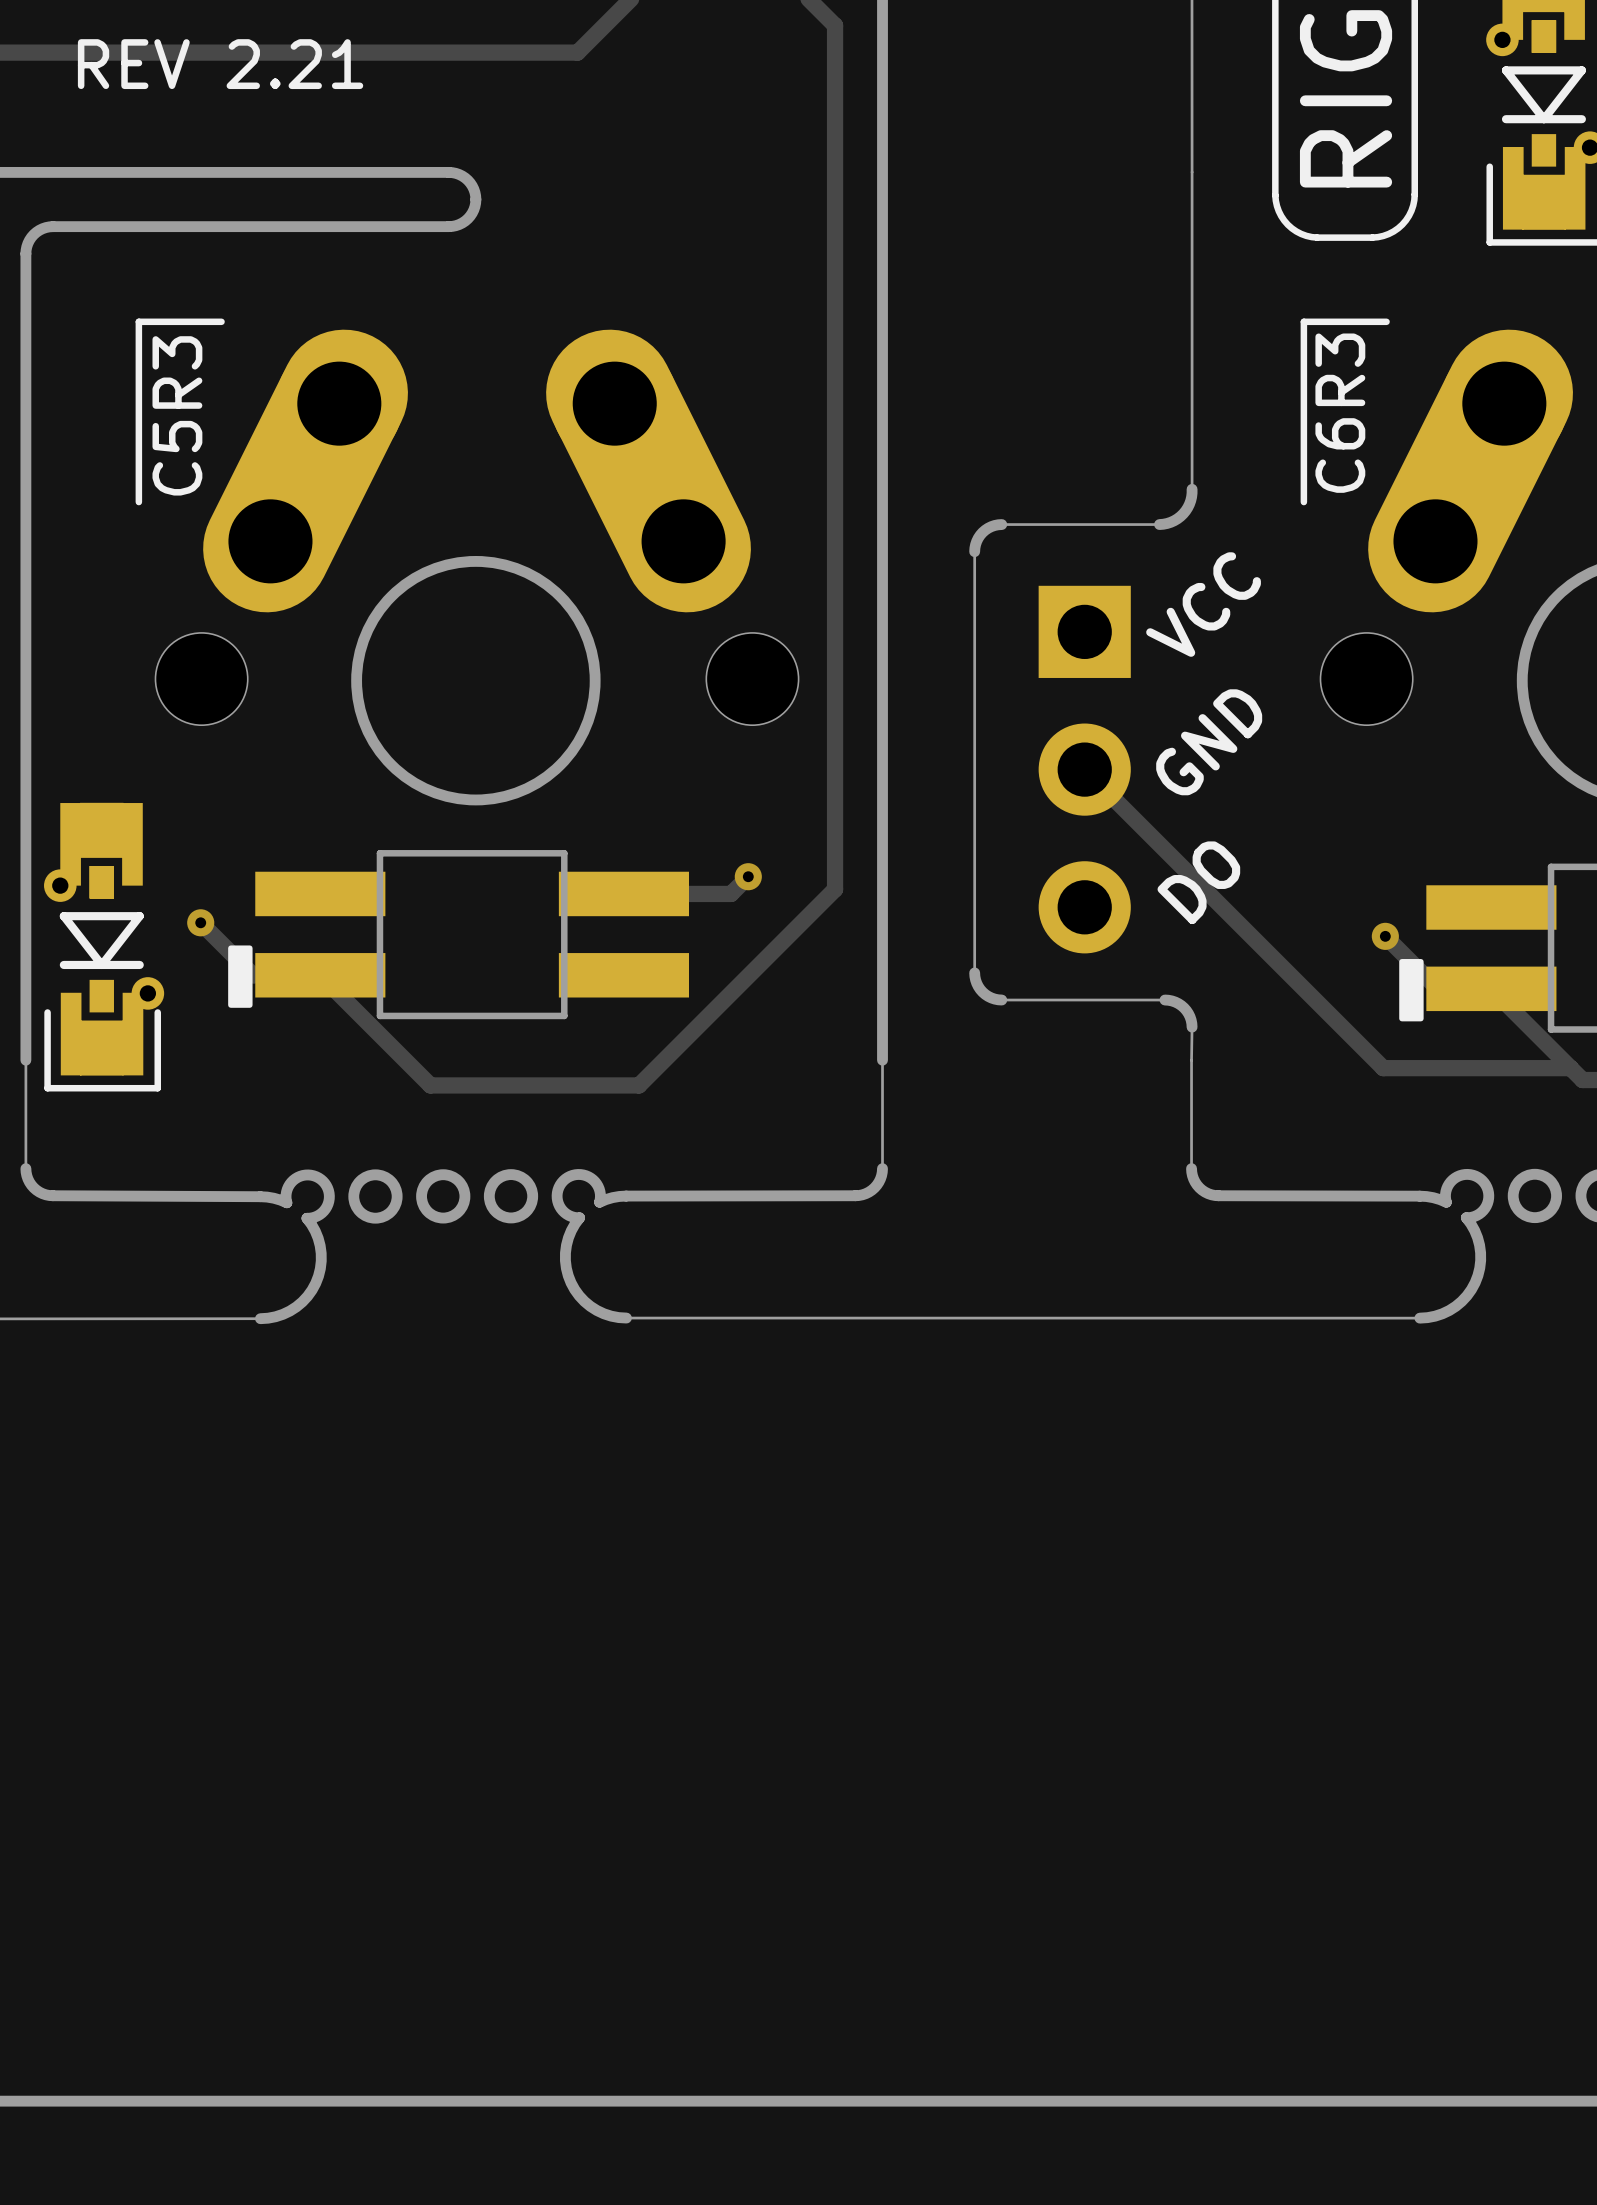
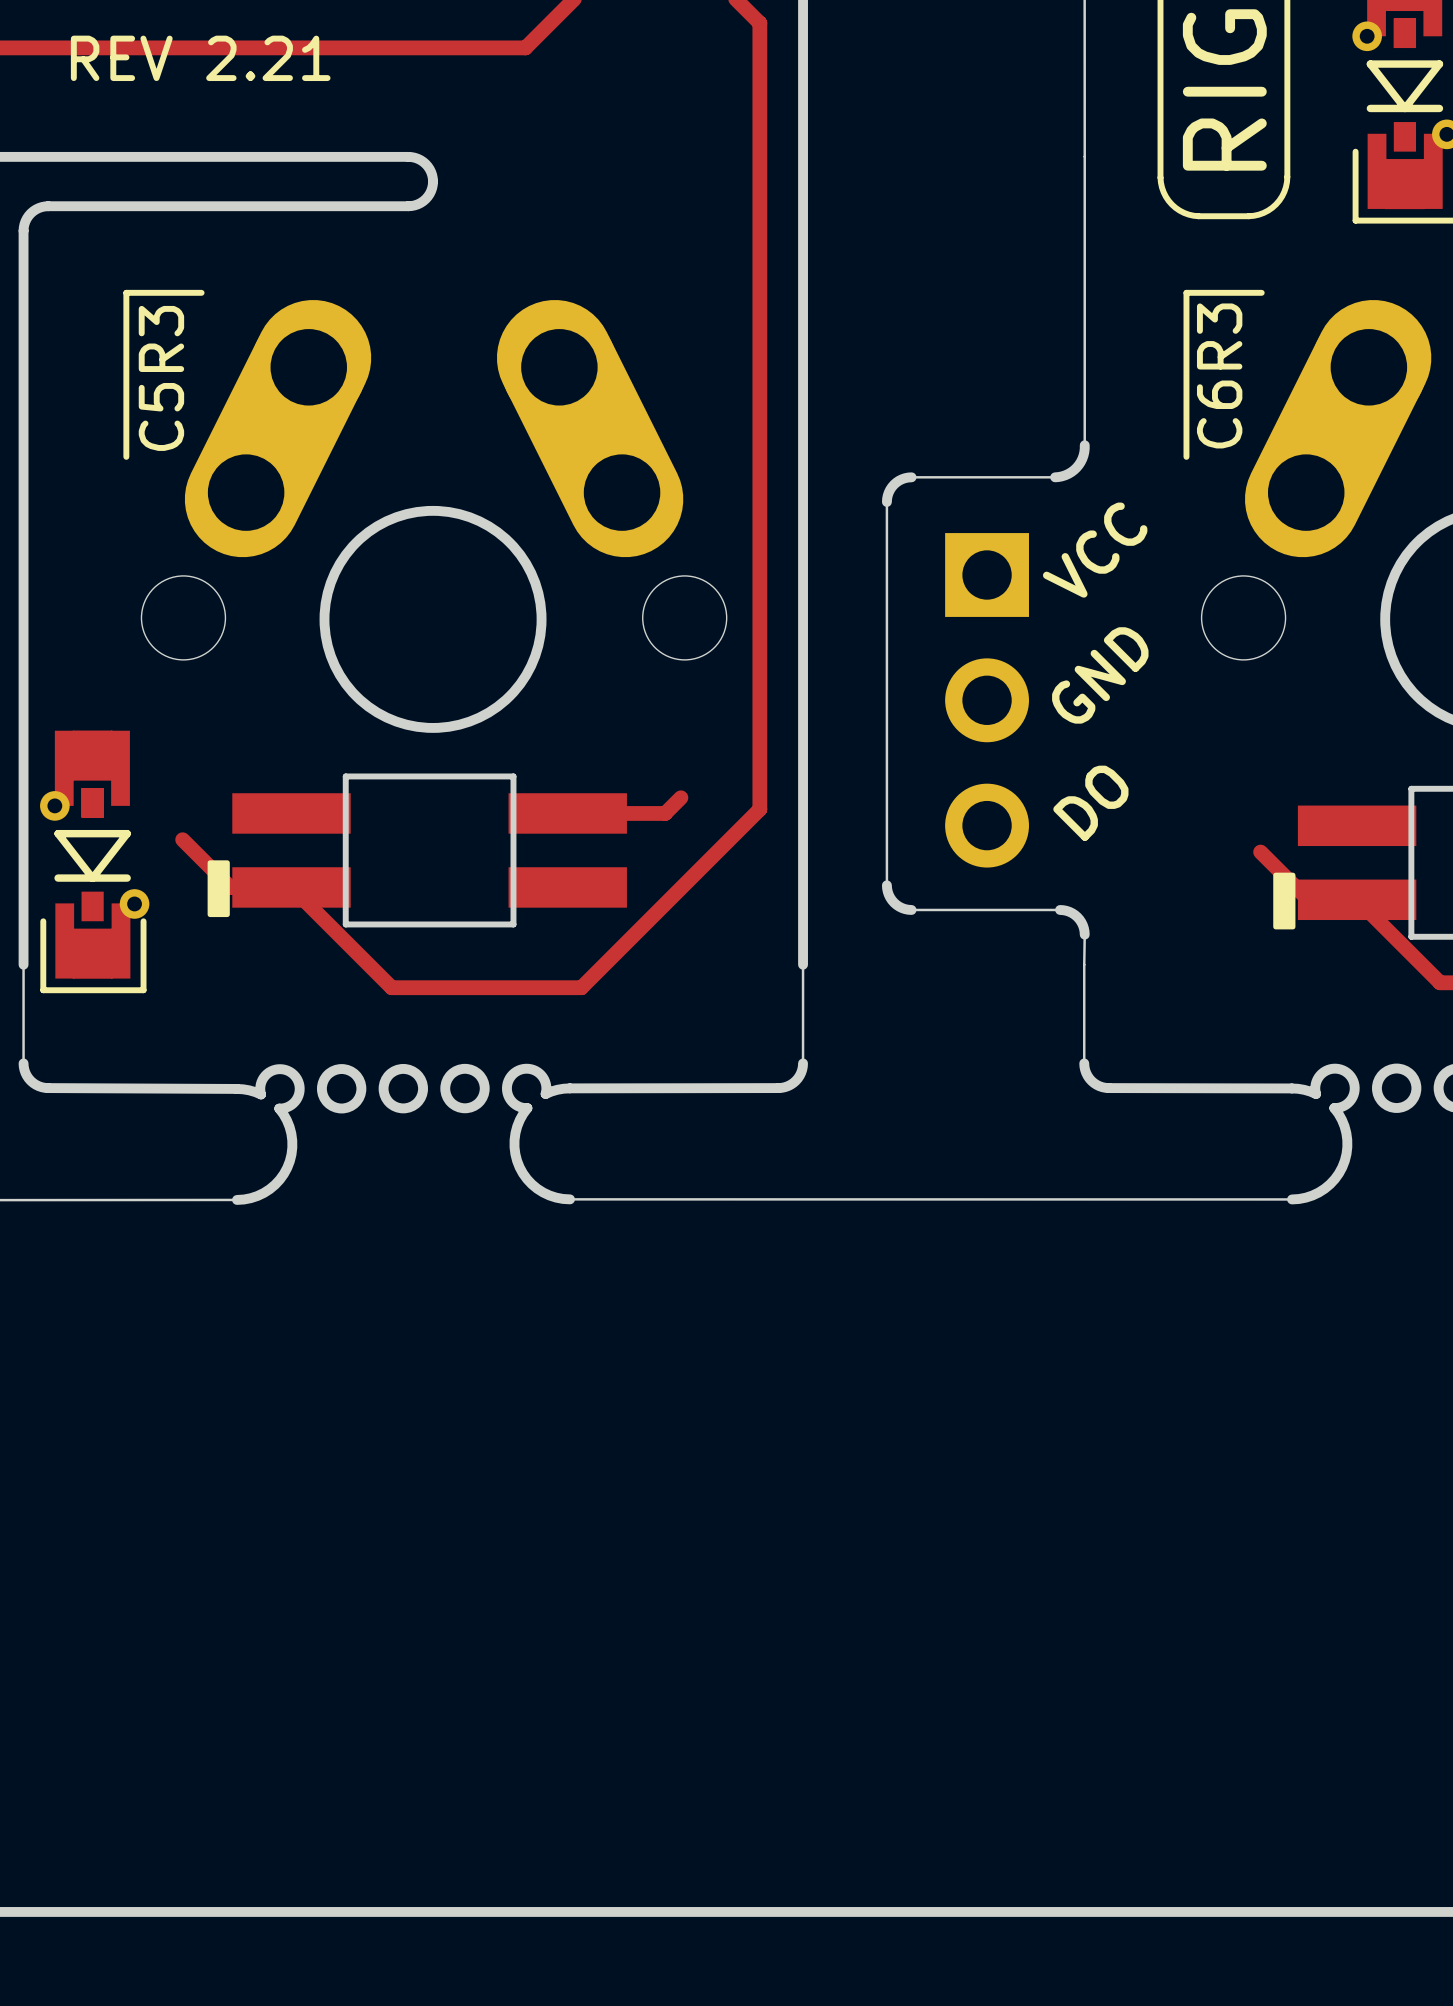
track: (1084, 769) (1383, 1068) (1570, 1068) -> none
via: (748, 876) -> none
via: (200, 922) -> none
via: (1385, 936) -> none

